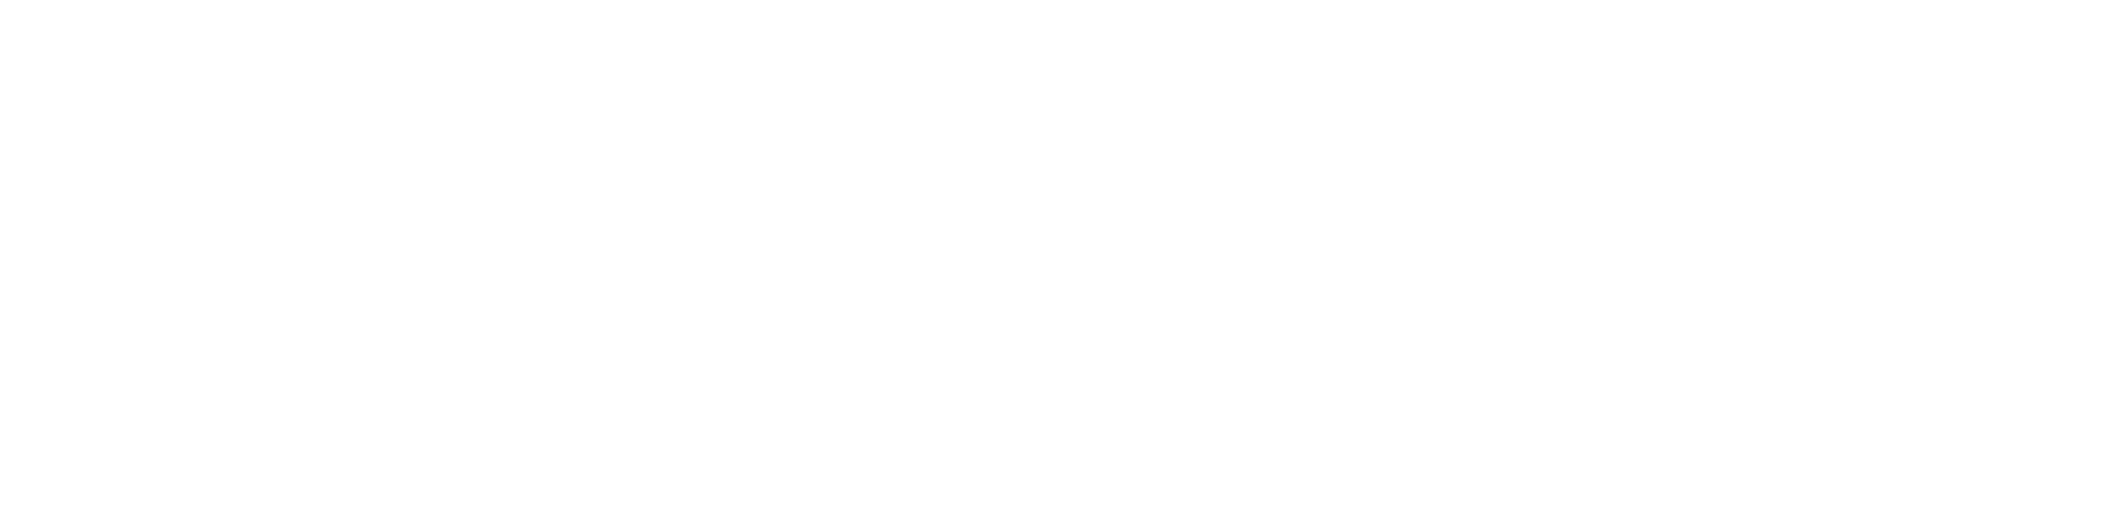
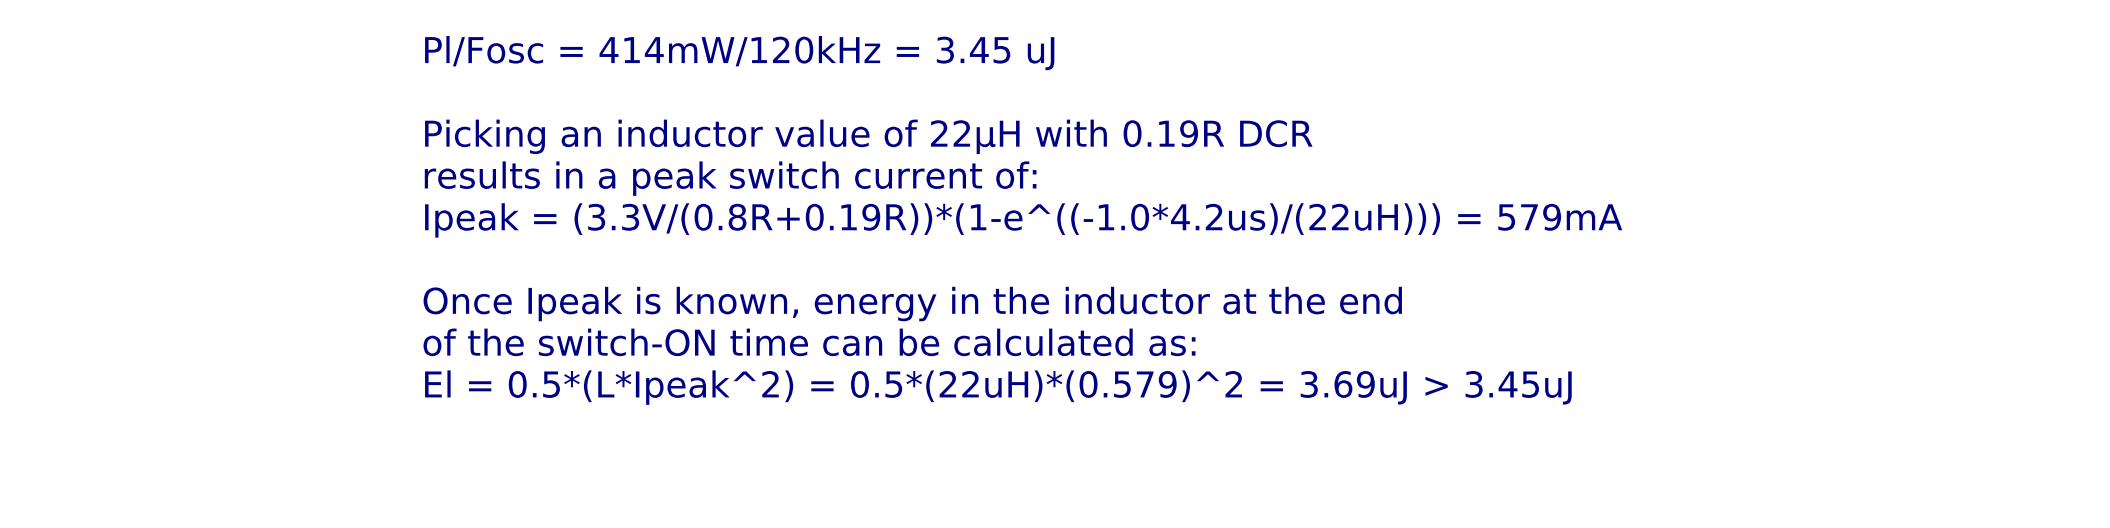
text: none -> Pl/Fosc = 414mW/120kHz = 3.45 uJ (739, 53)
text: none -> Picking an inductor value of 22μH with 0.19R DCR (868, 136)
text: none -> results in a peak switch current of: (730, 178)
text: none -> Ipeak = (3.3V/(0.8R+0.19R))*(1-e^((-1.0*4.2us)/(22uH))) = 579mA (1023, 220)
text: none -> Once Ipeak is known, energy in the inductor at the end (912, 304)
text: none -> of the switch-ON time can be calculated as: (809, 342)
text: none -> El = 0.5*(L*Ipeak^2) = 0.5*(22uH)*(0.579)^2 = 3.69uJ > 3.45uJ (998, 387)

